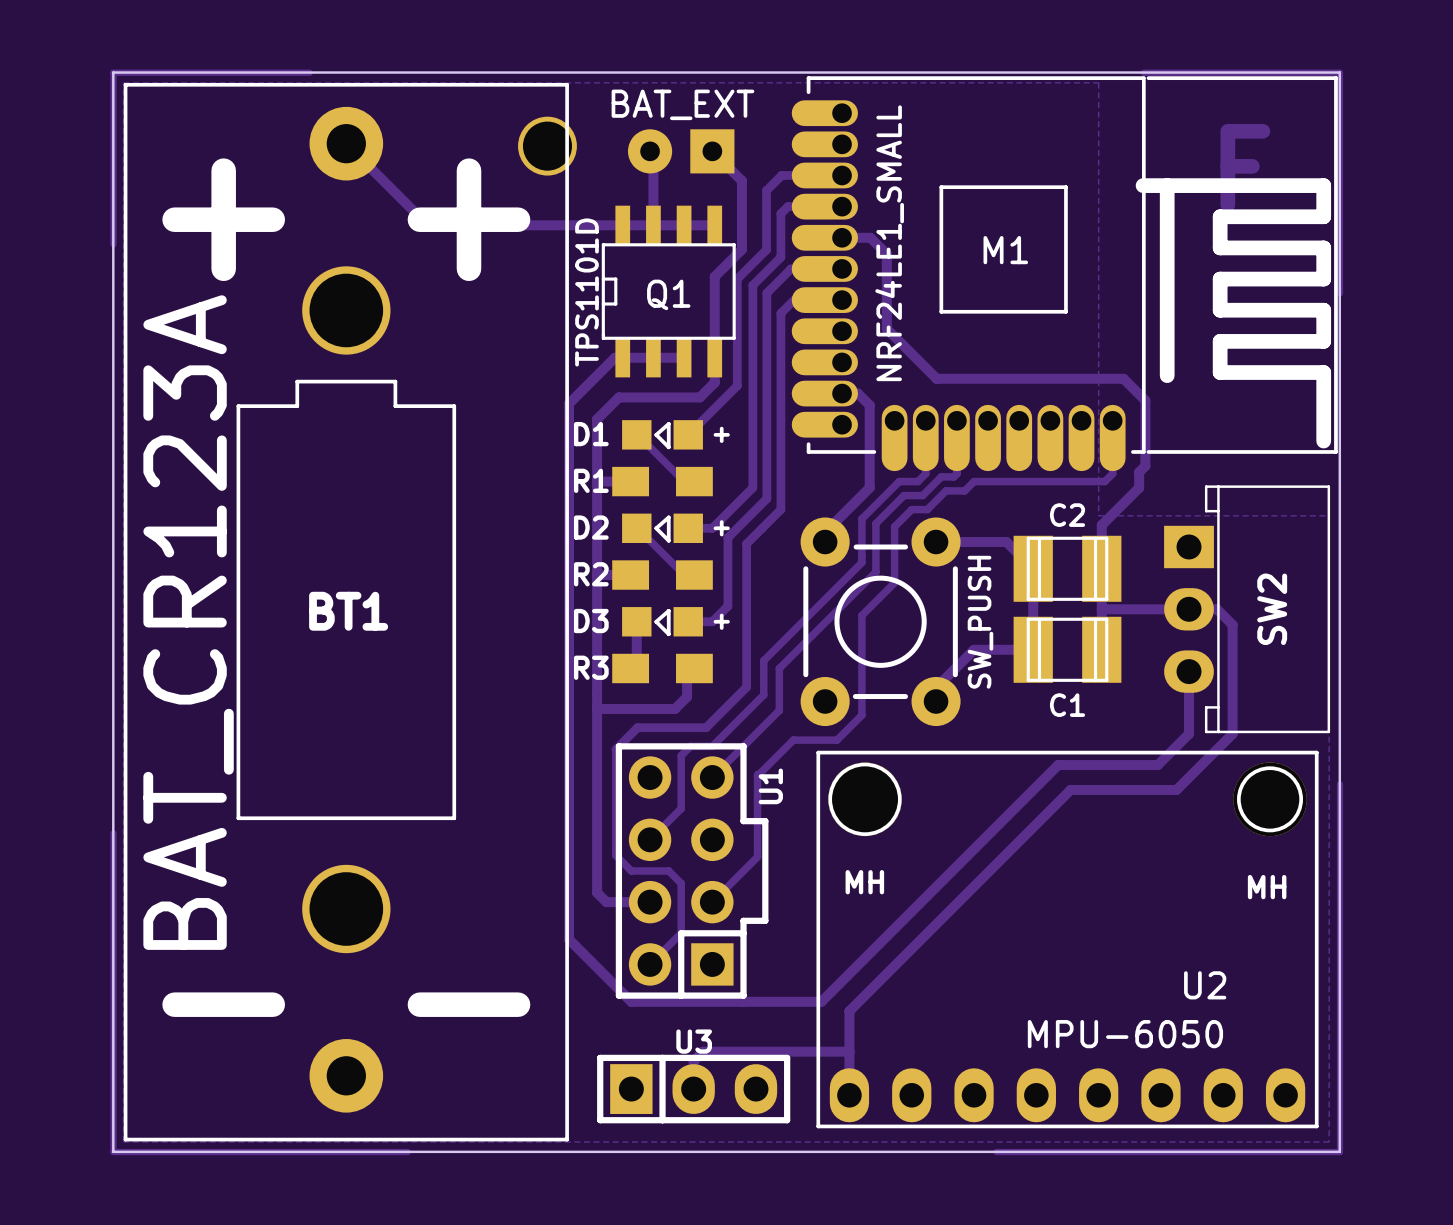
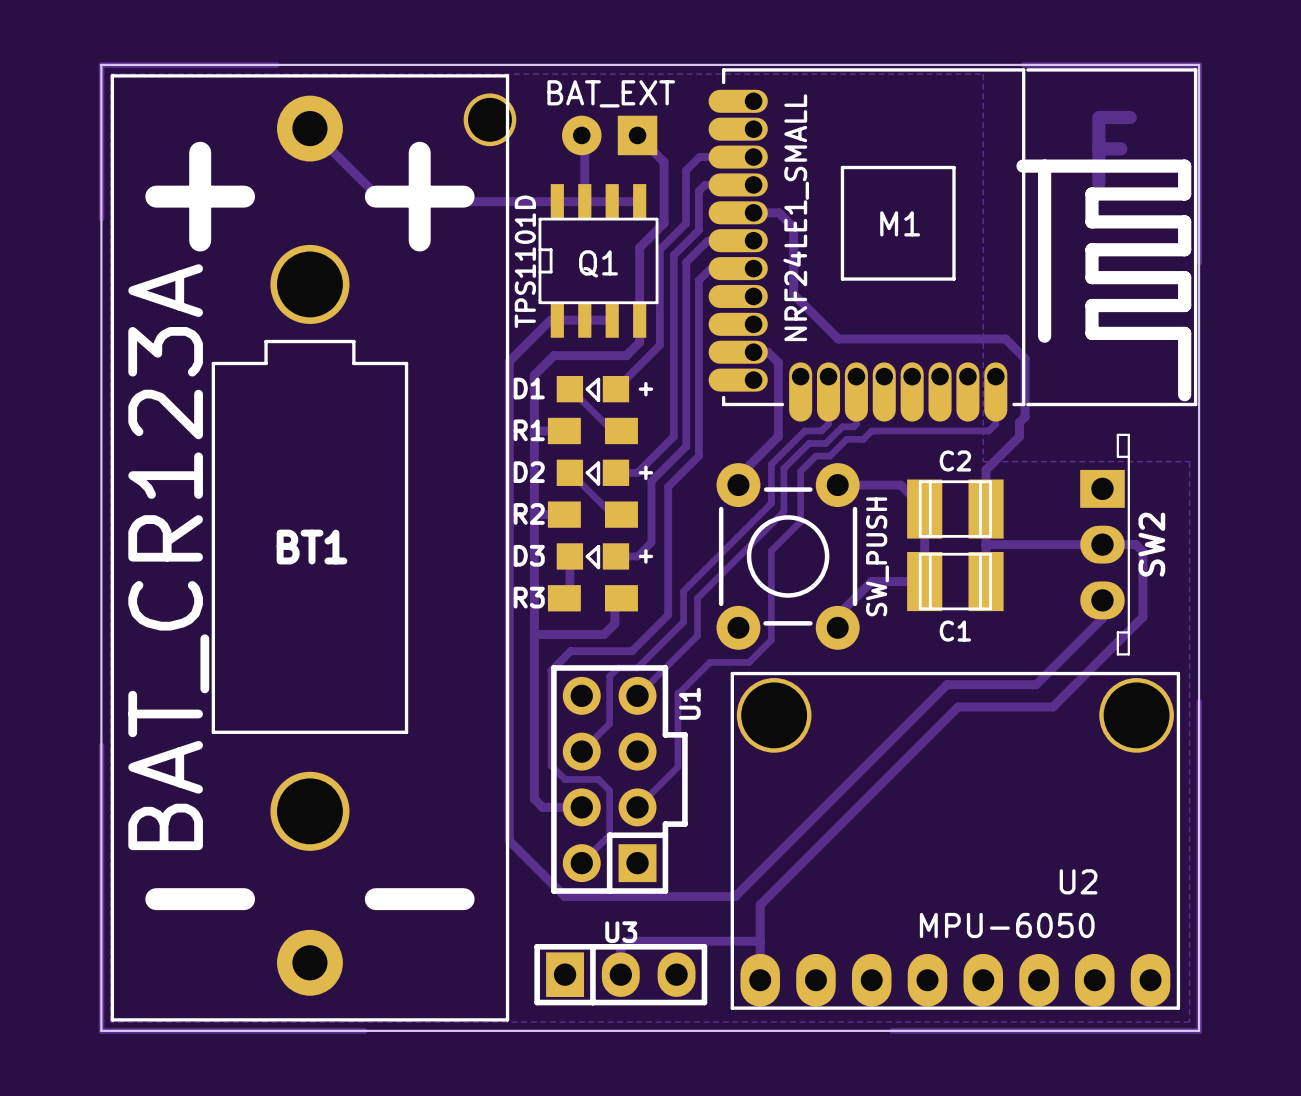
BT1 footprint: [123, 82, 577, 1142] -> [110, 74, 517, 1022]
SW2 footprint: [1164, 485, 1331, 734] -> [1080, 433, 1130, 656]
track: (1101, 609) (1217, 609) (1232, 624) (1232, 733) -> (986, 544) (1135, 544) (1142, 551) (1142, 617) (1103, 656)
track: (1189, 671) (1189, 733) -> (1102, 600) (1102, 618) (1064, 656)
U2 footprint: [816, 750, 1319, 1129] -> [730, 671, 1181, 1010]
MH: (865, 799) -> none
MH: (1270, 799) -> none

